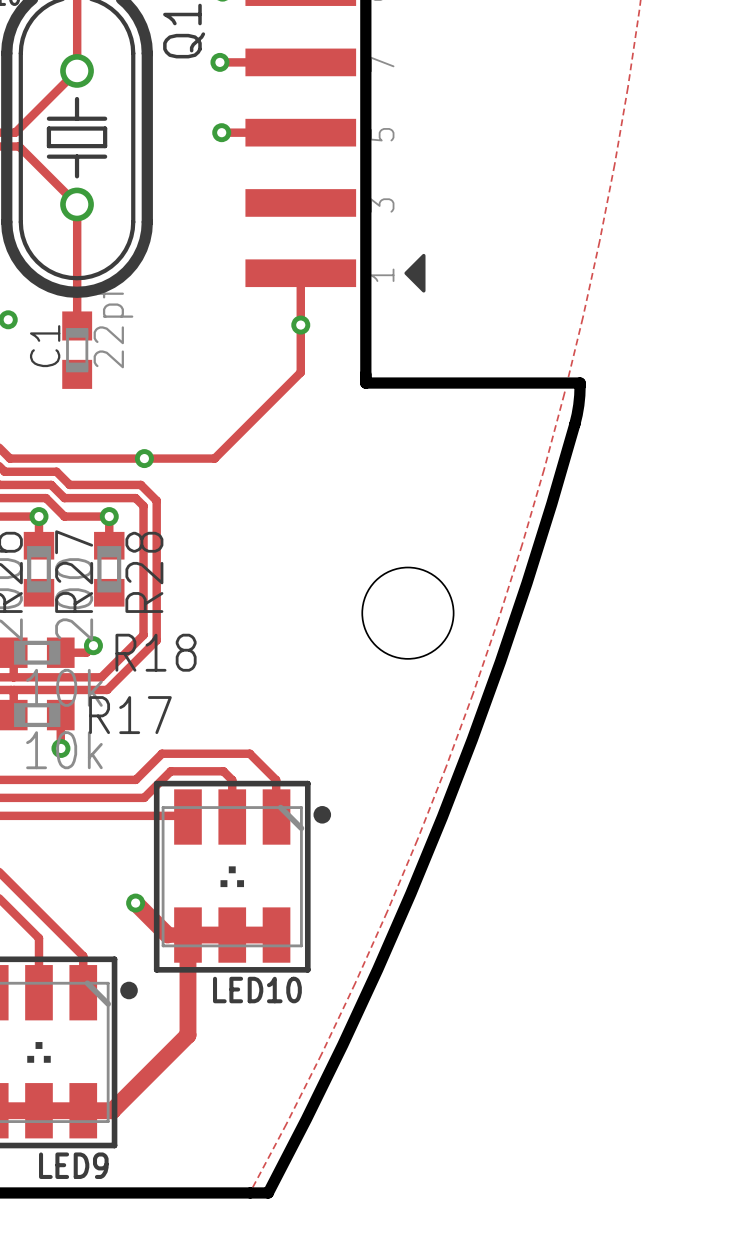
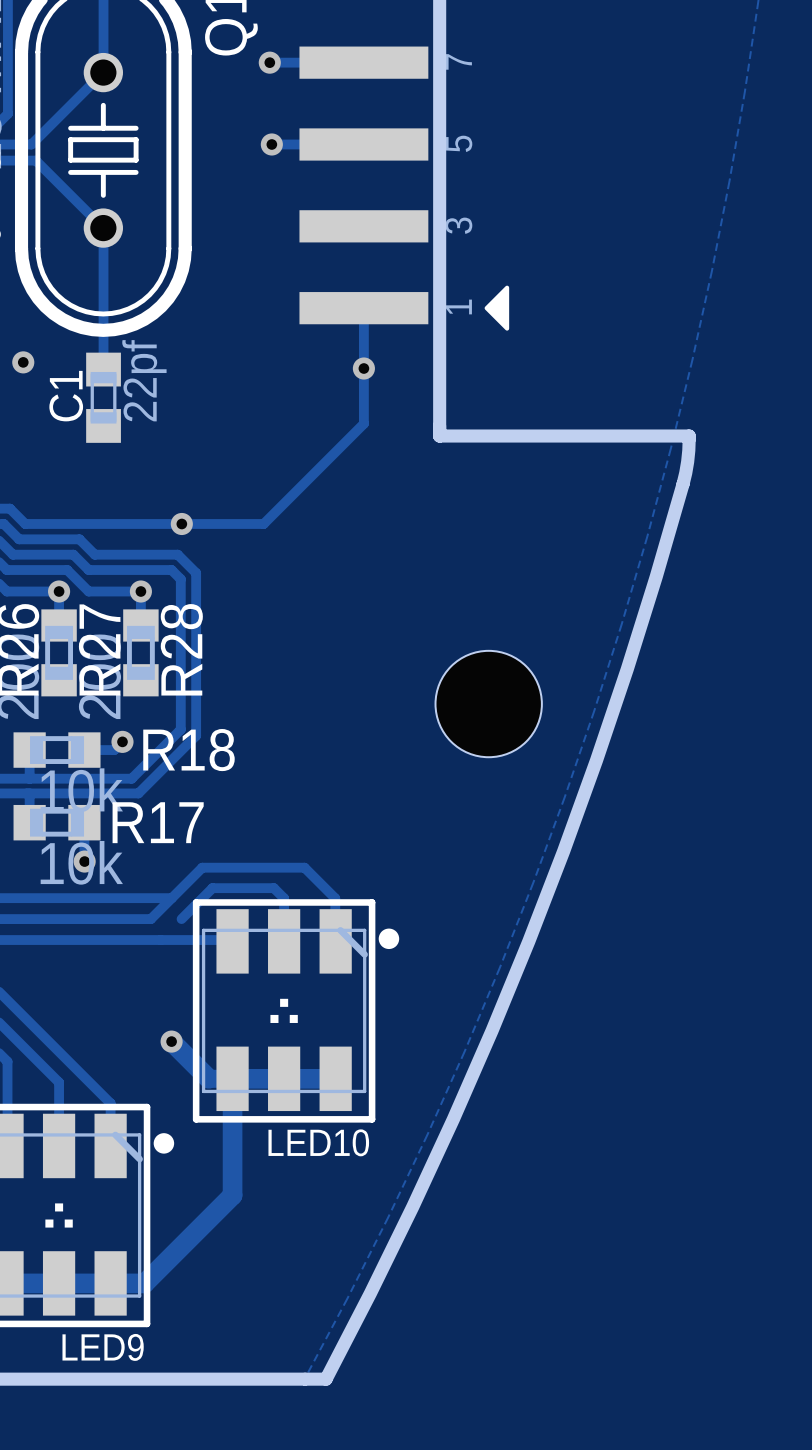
track: (117, 797) (144, 797) -> (150, 919) (171, 898)

